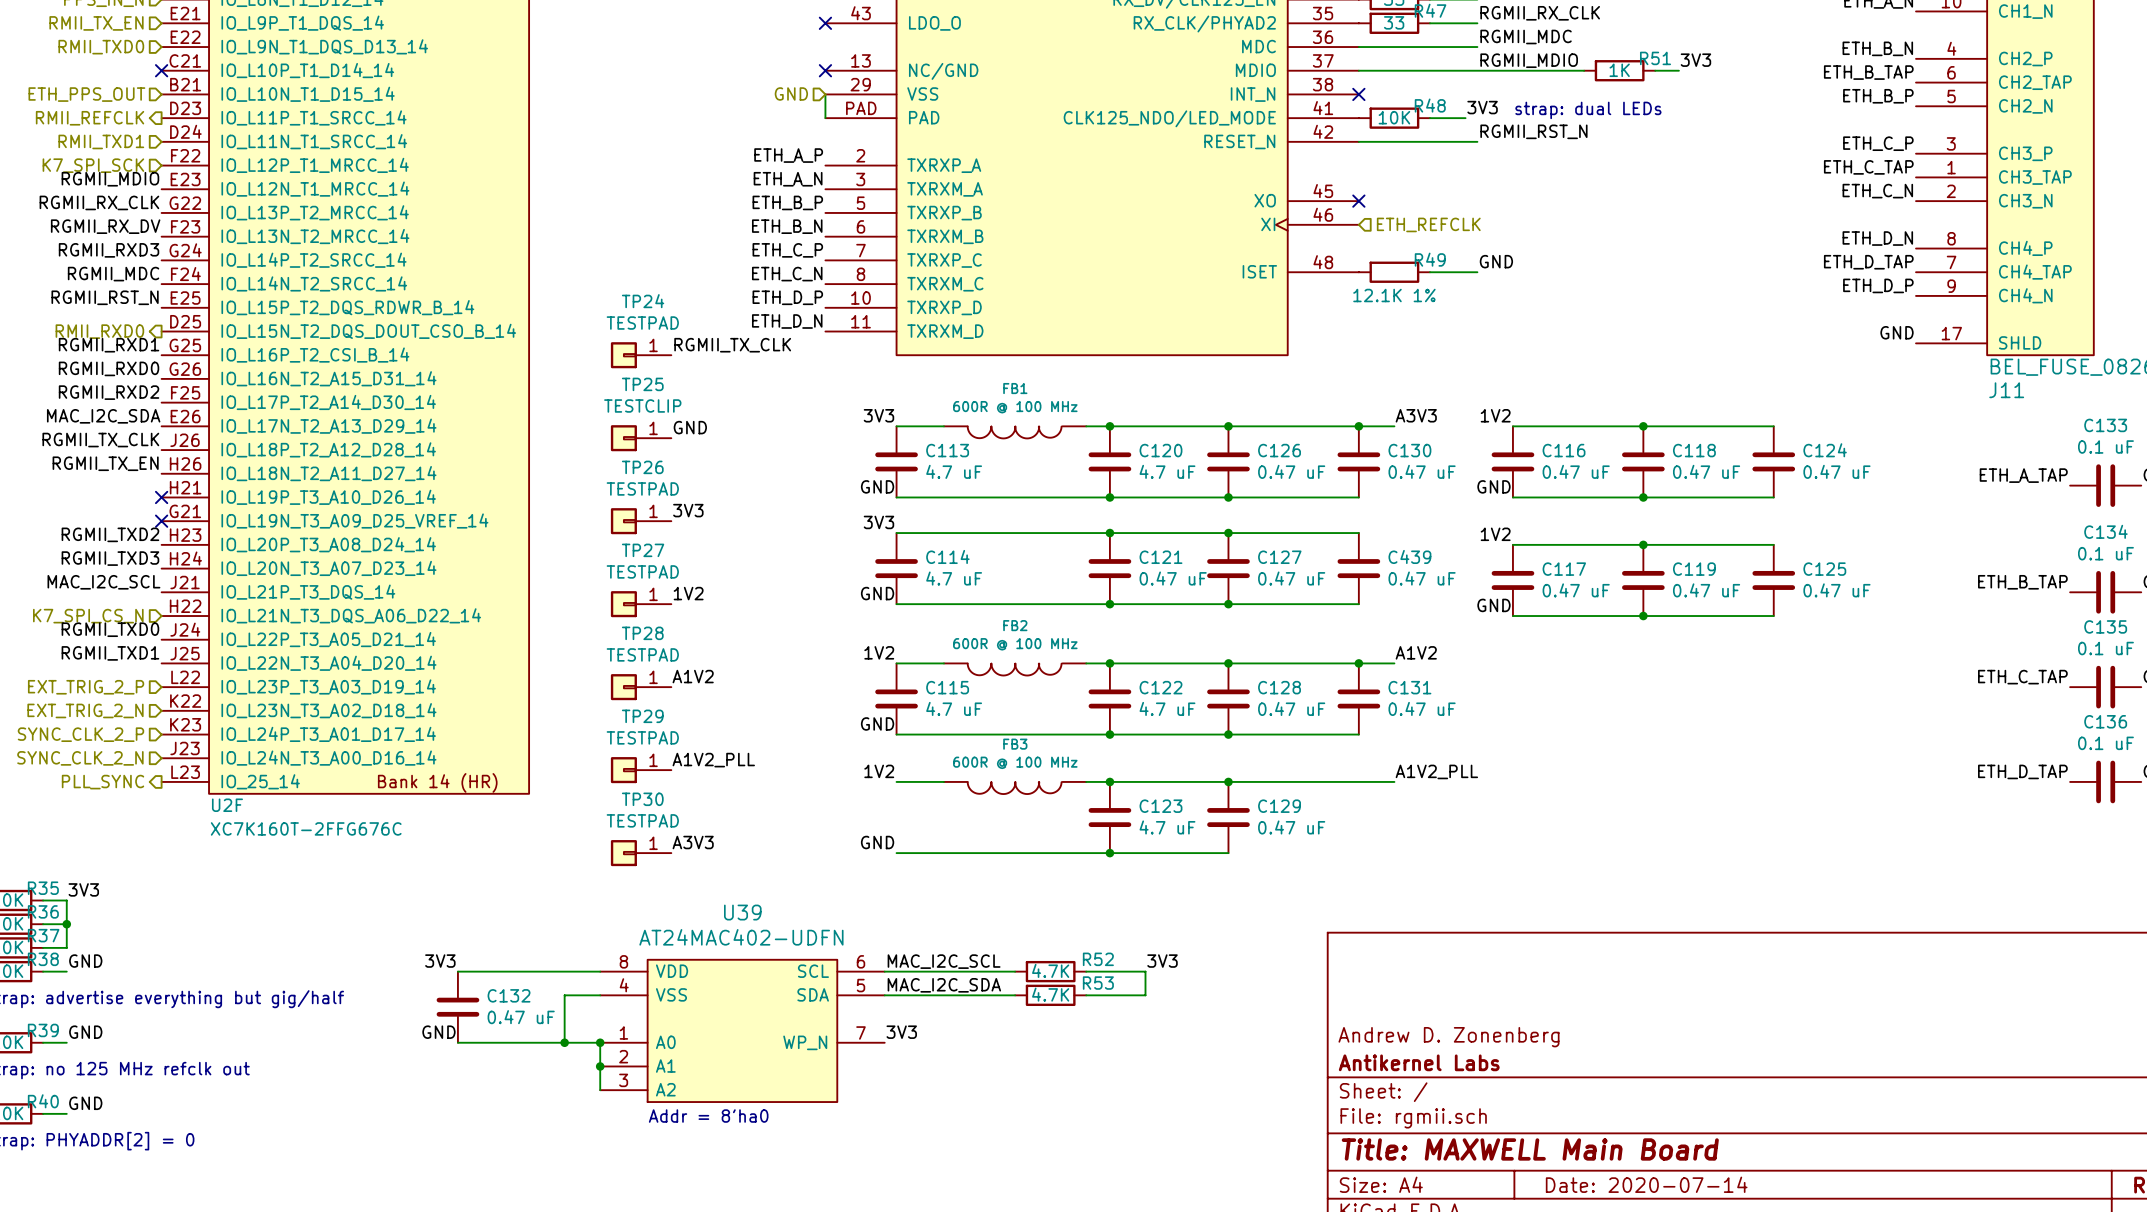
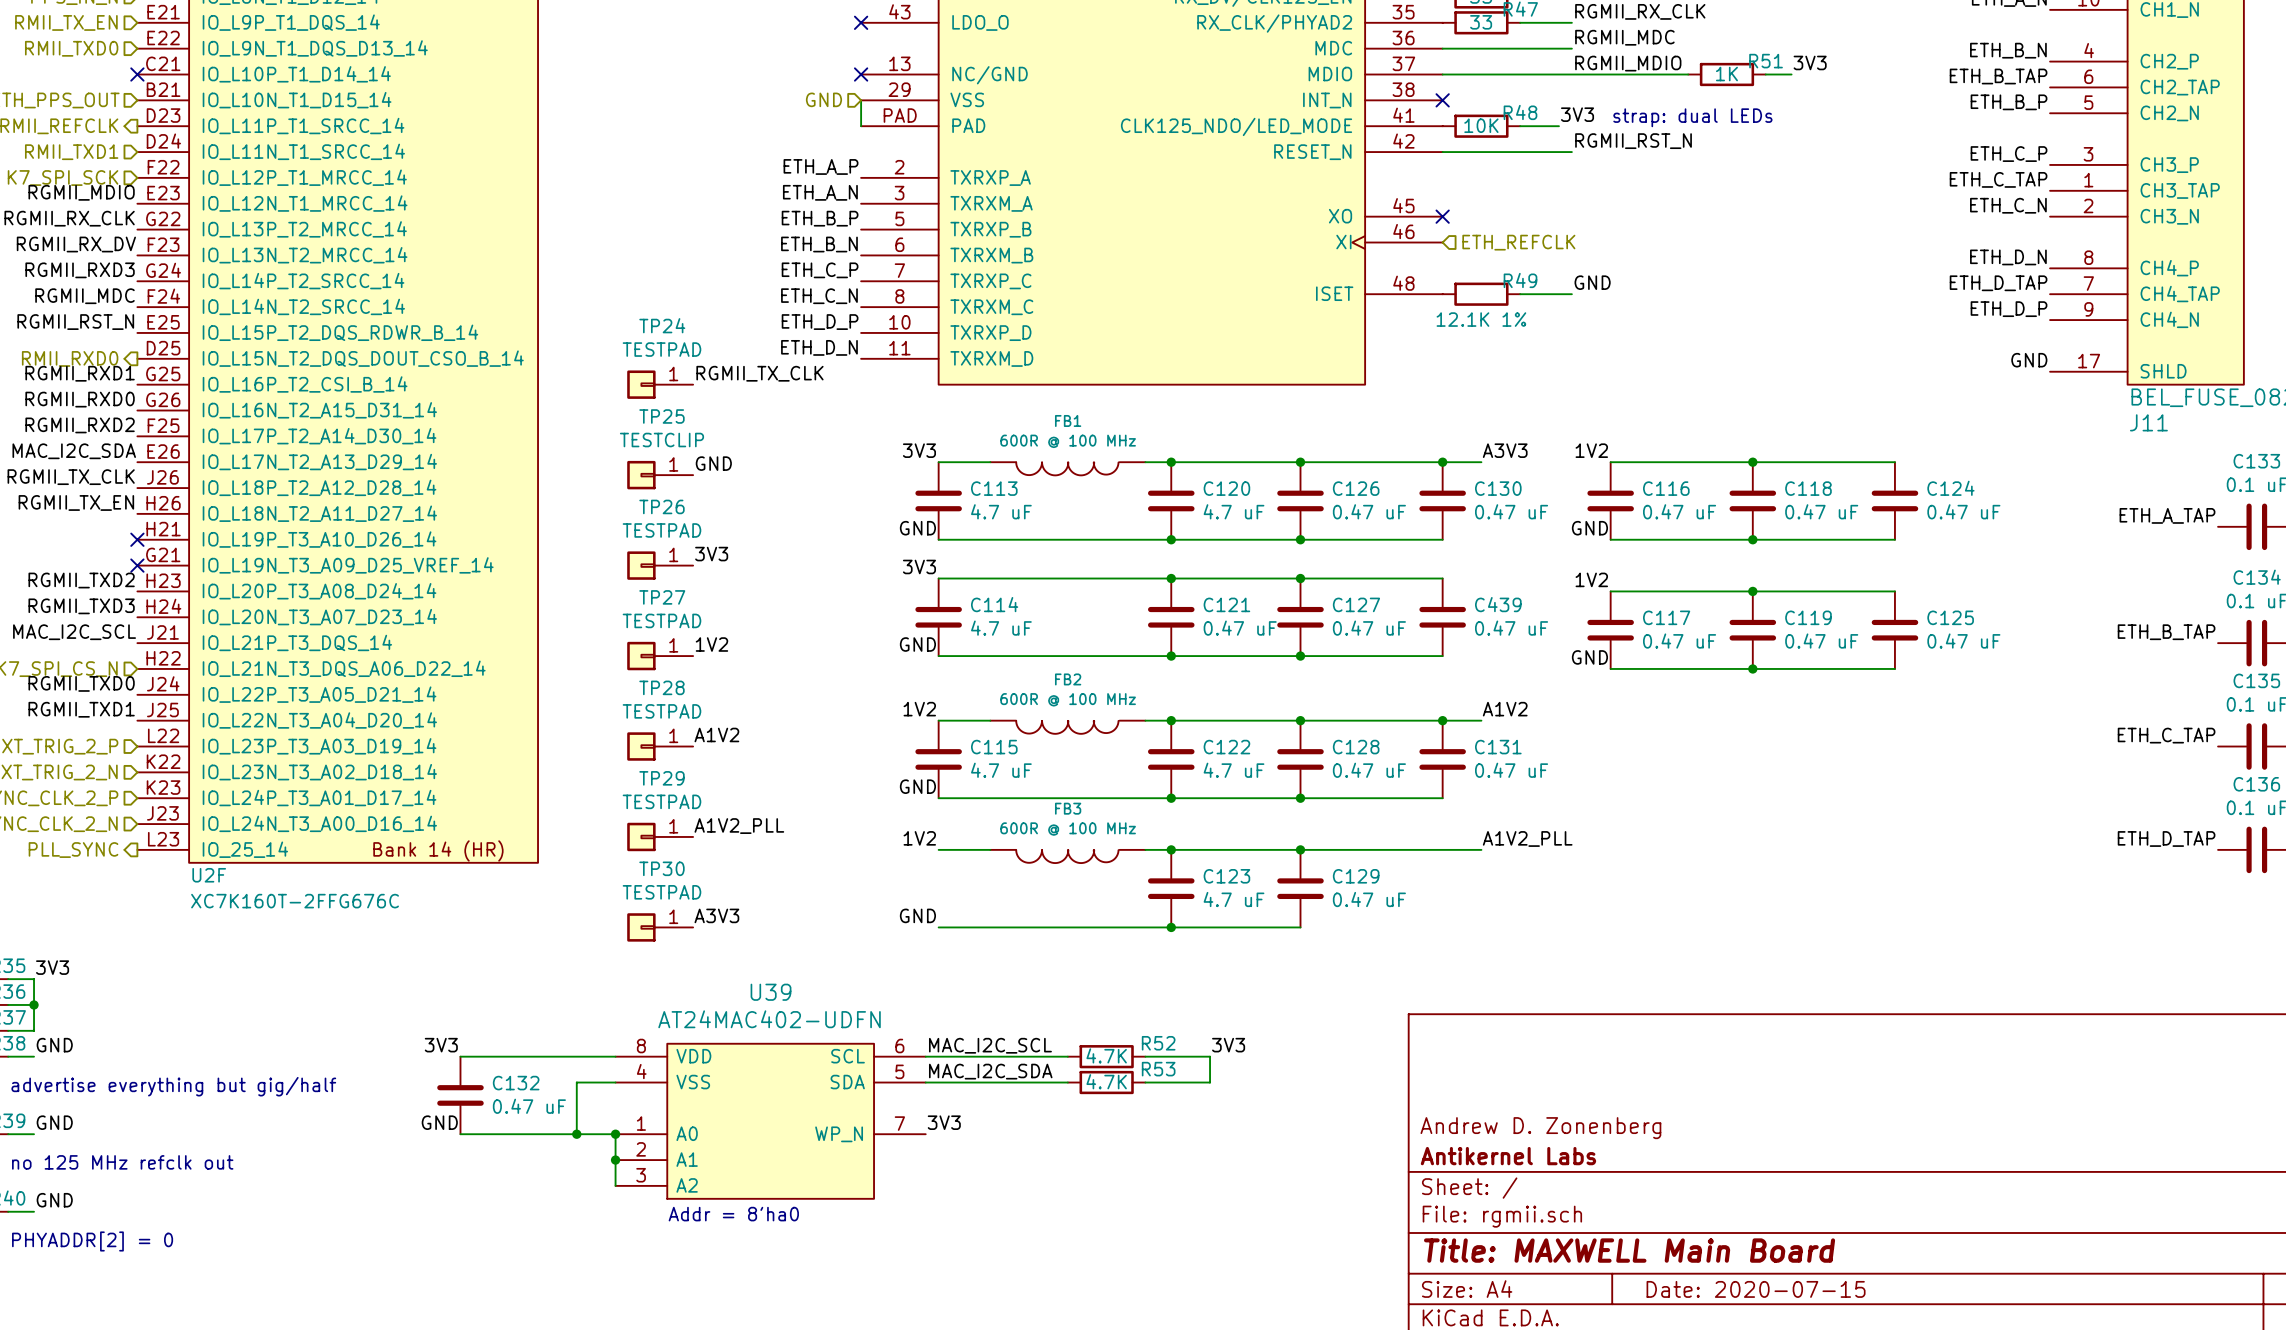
title block: Date: 2020-07-14 (1646, 1184) -> Date: 2020-07-15 (1756, 1289)

